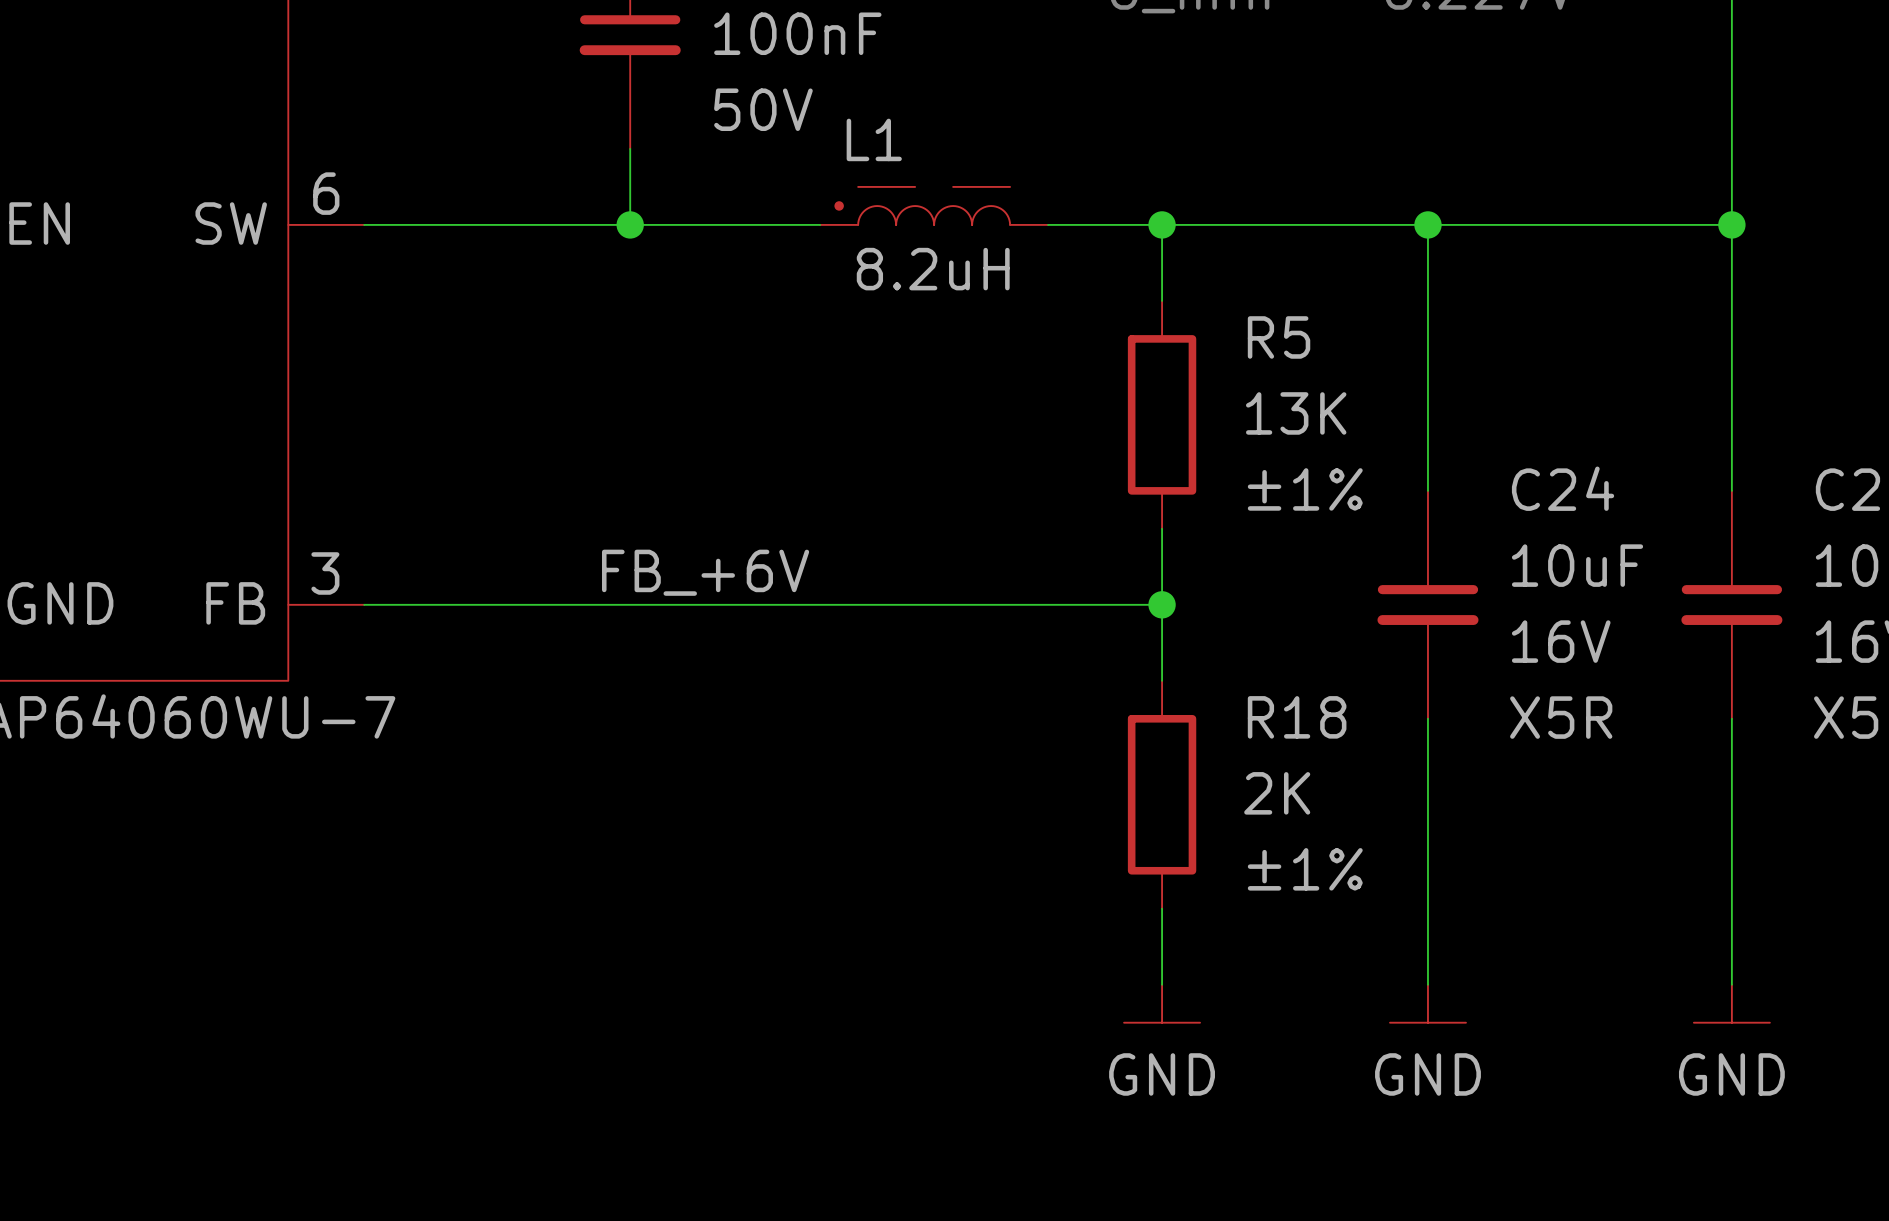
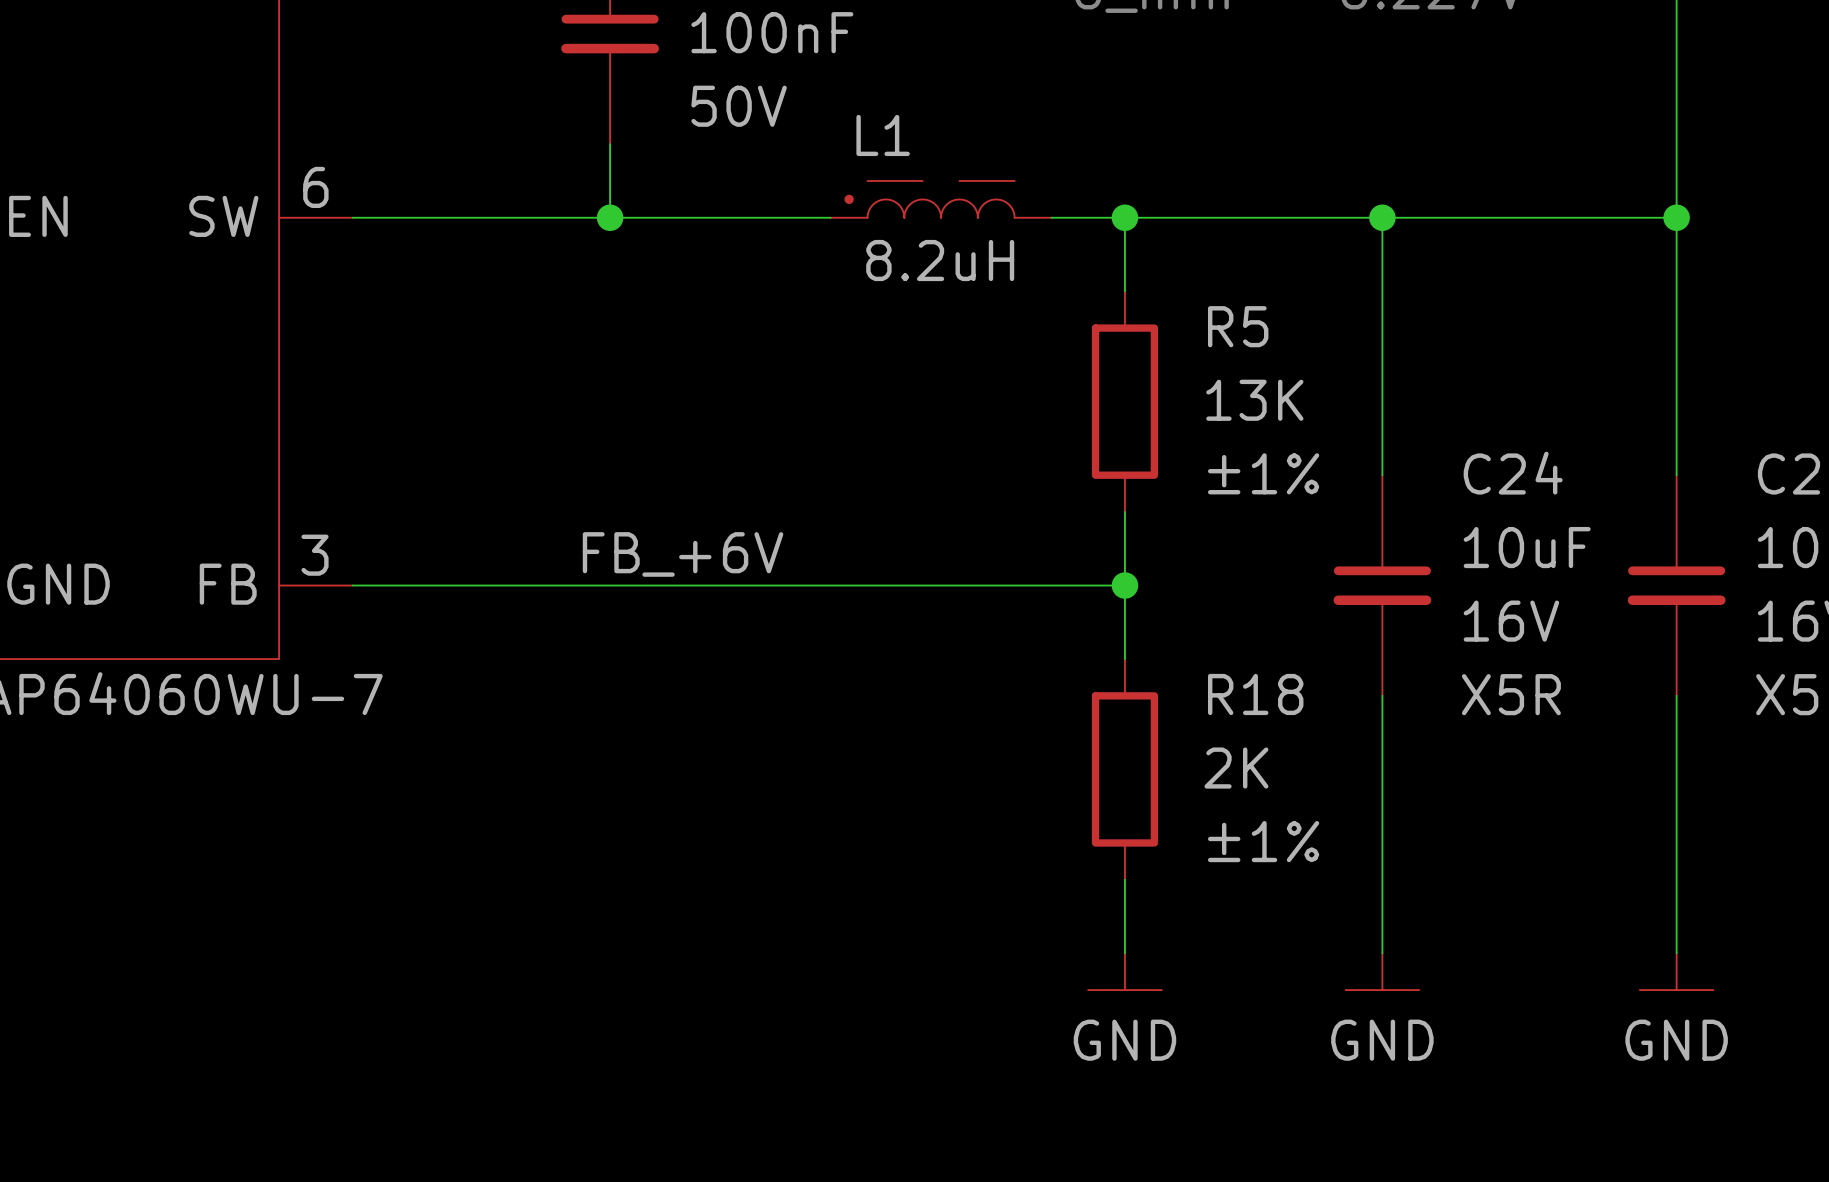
L1 position: (934, 205) -> (941, 199)

